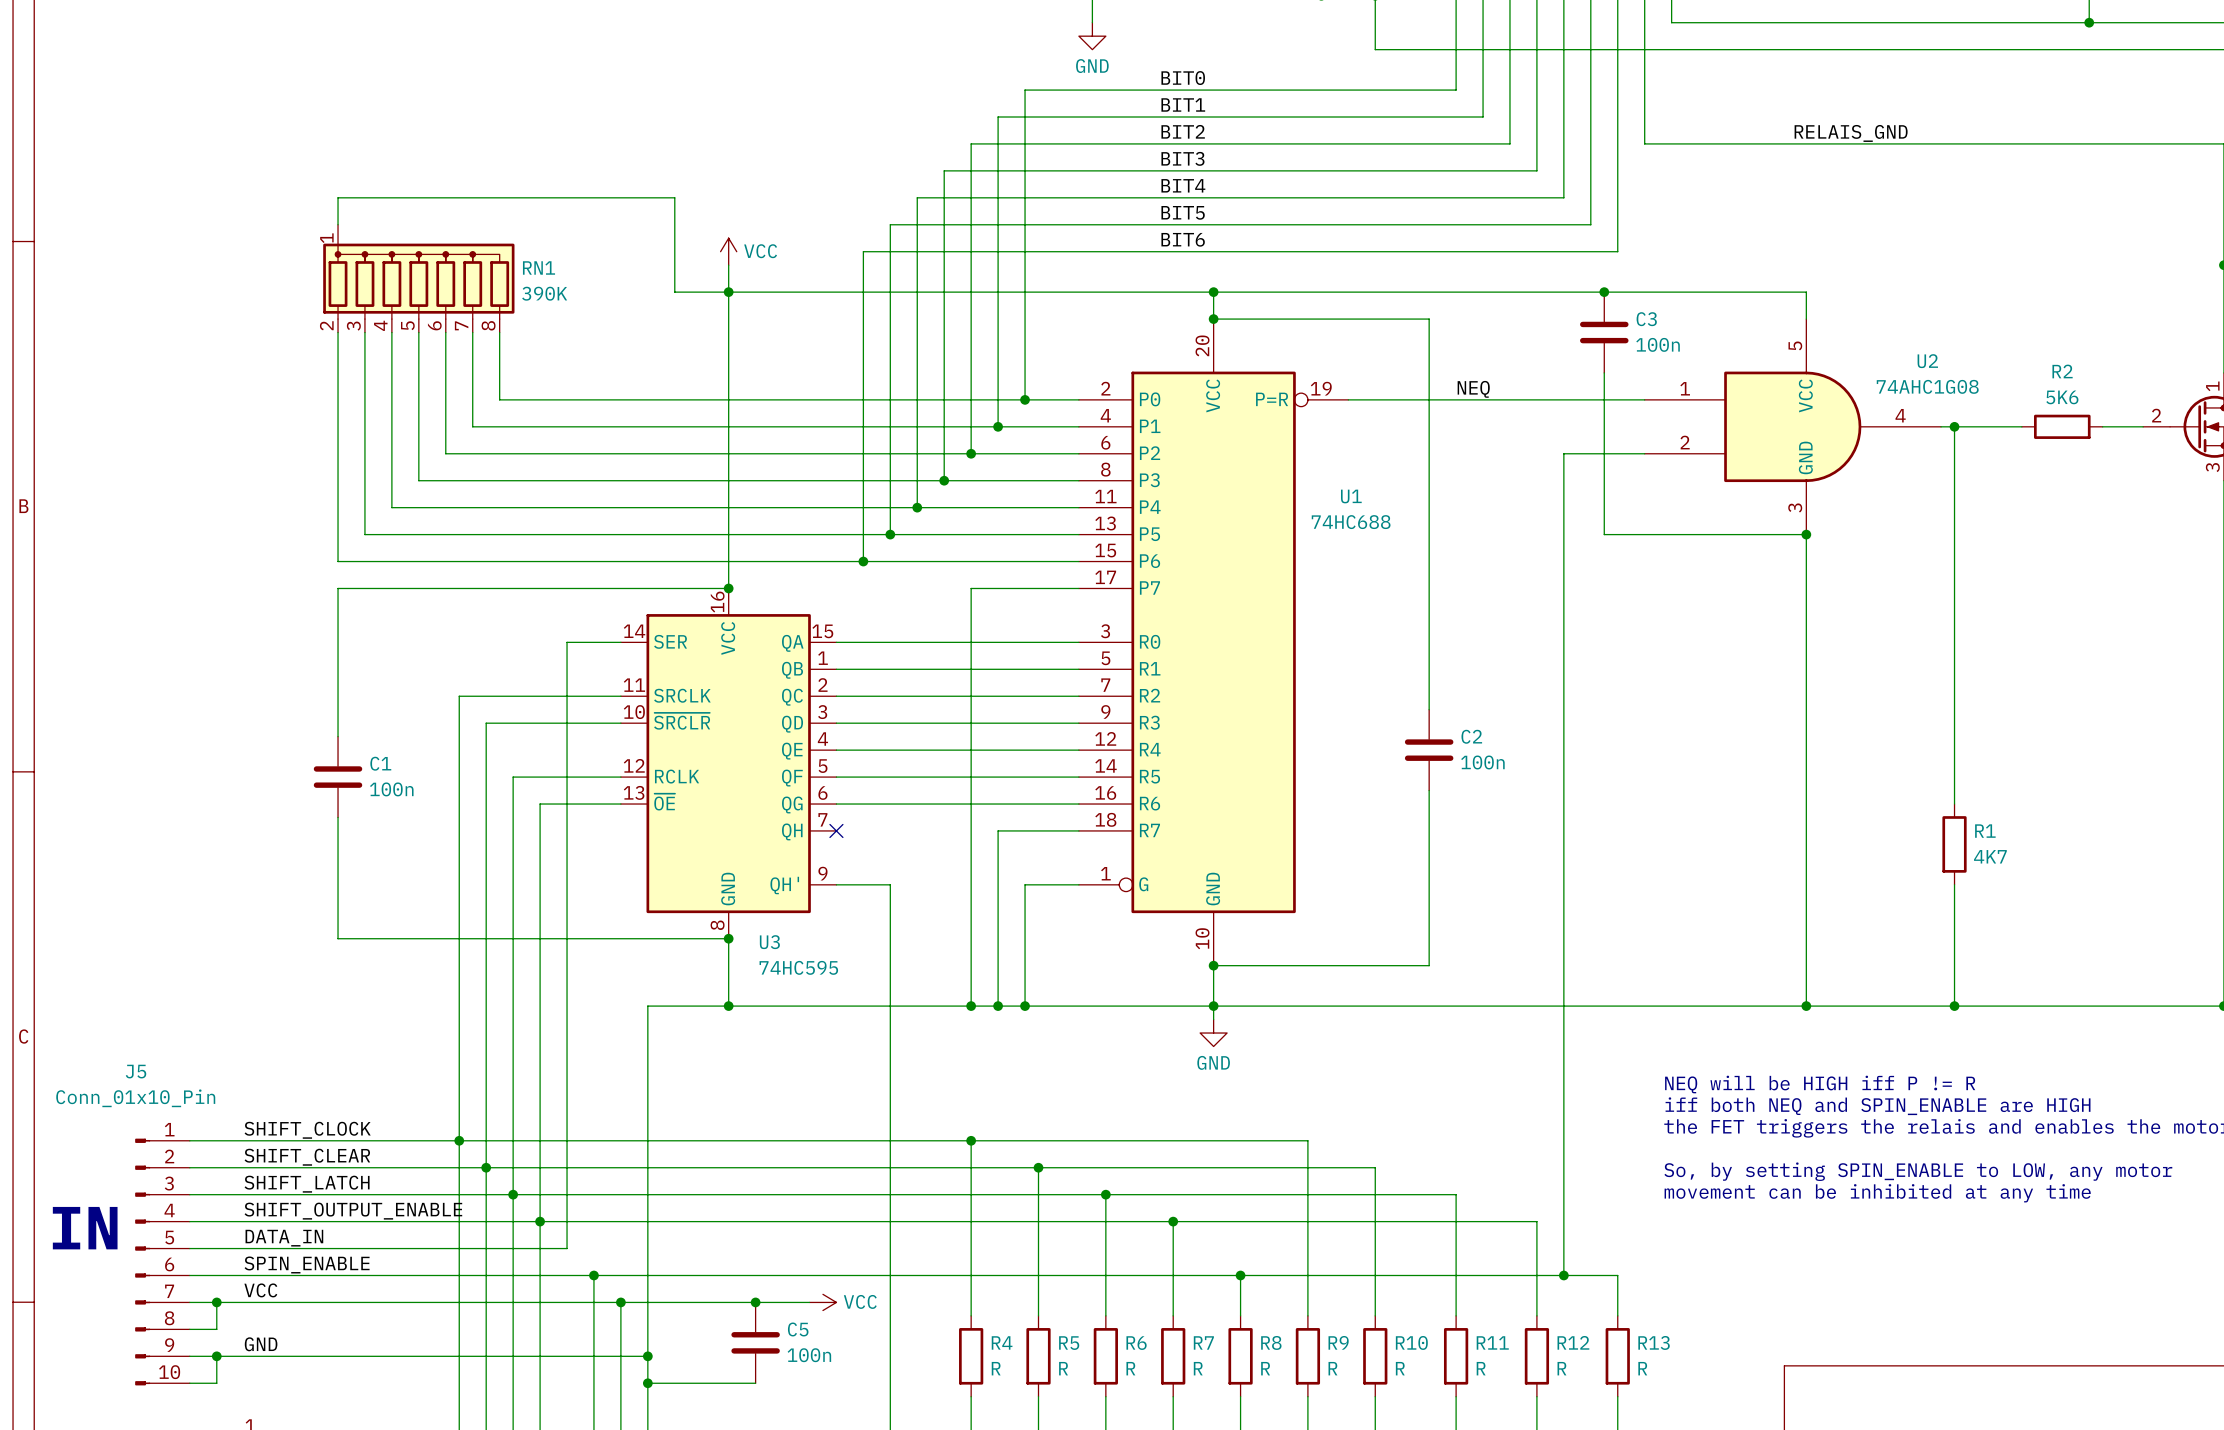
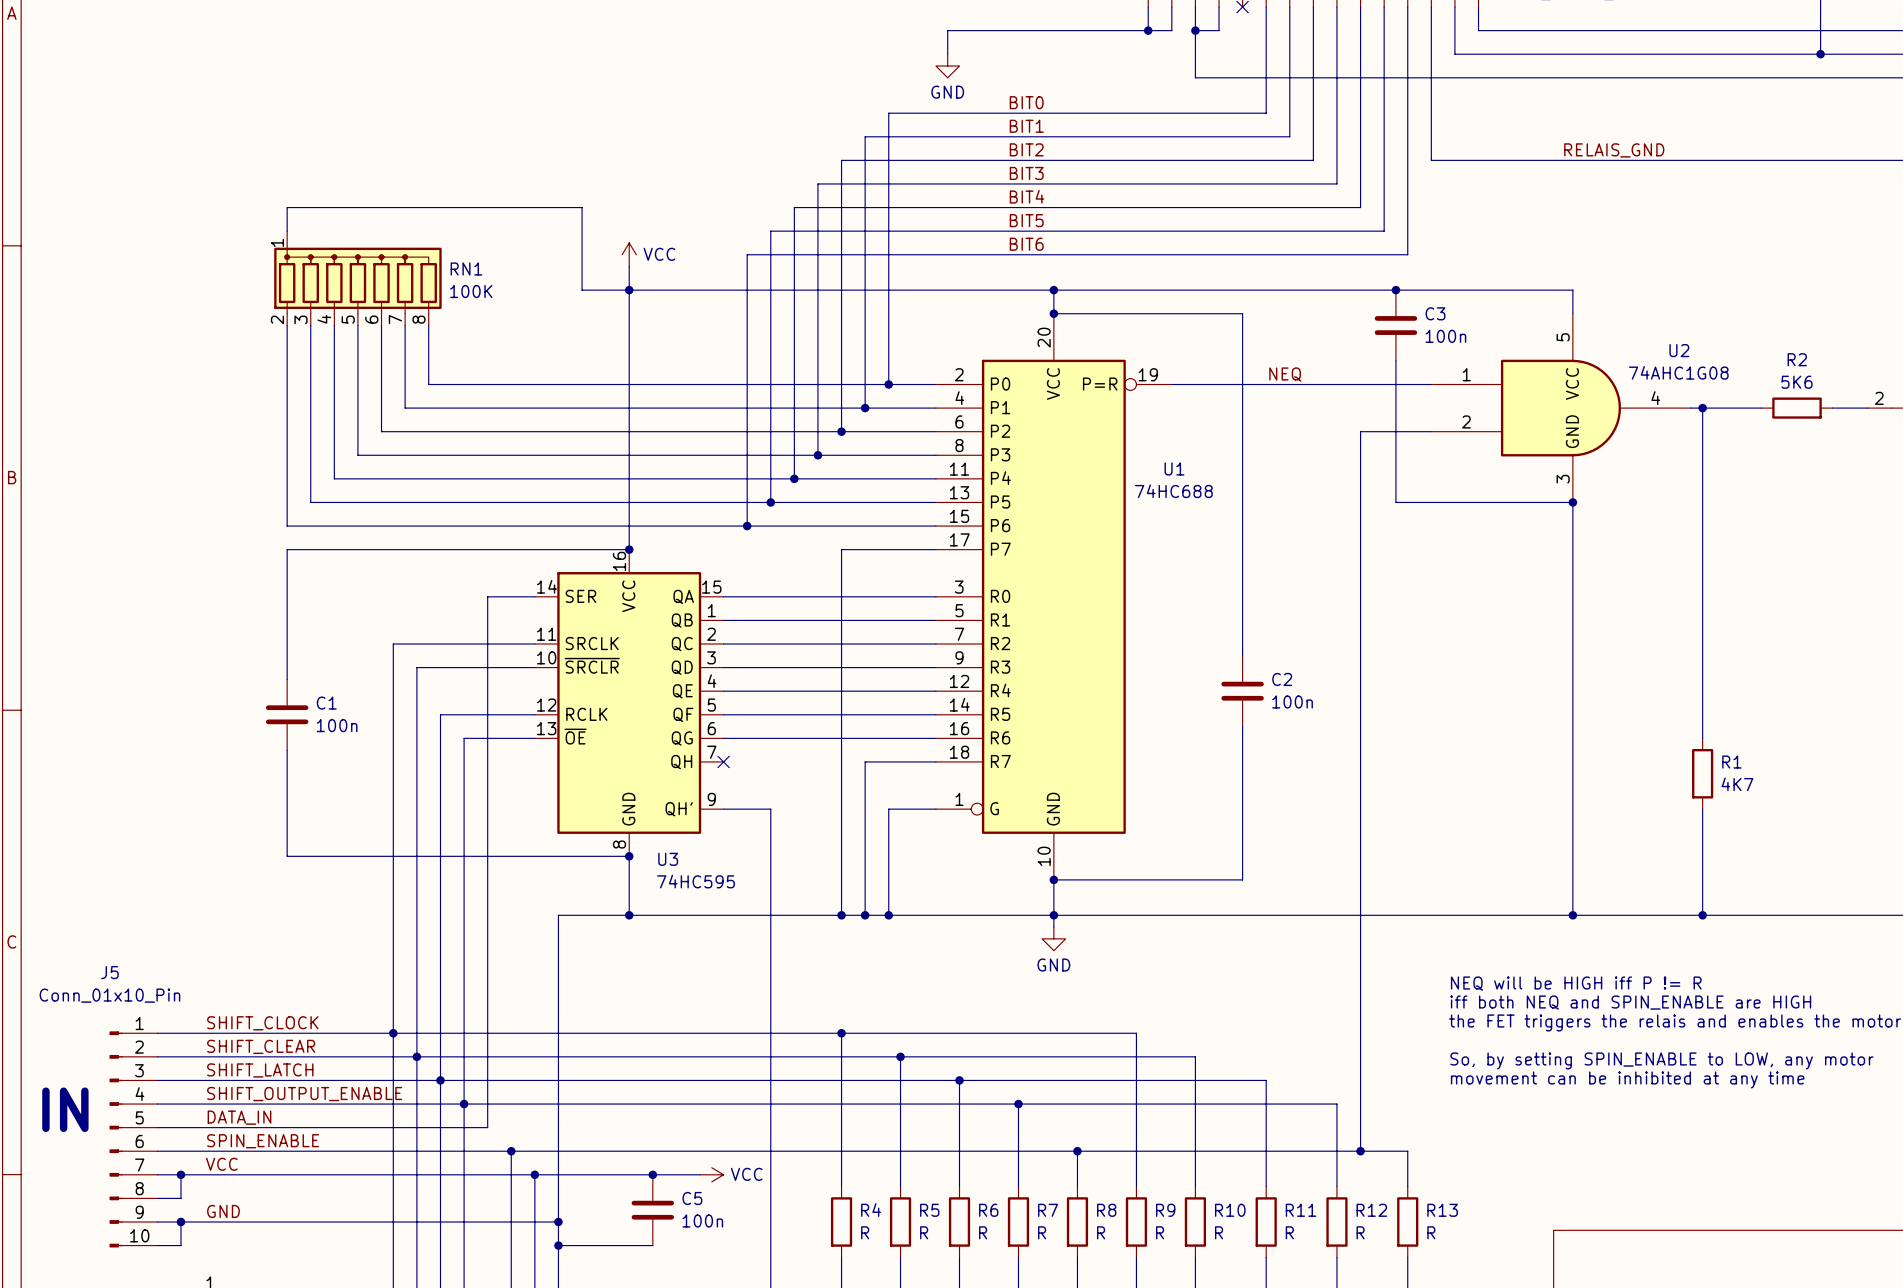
RN1 value: 390K (544, 293) -> 100K (471, 291)

